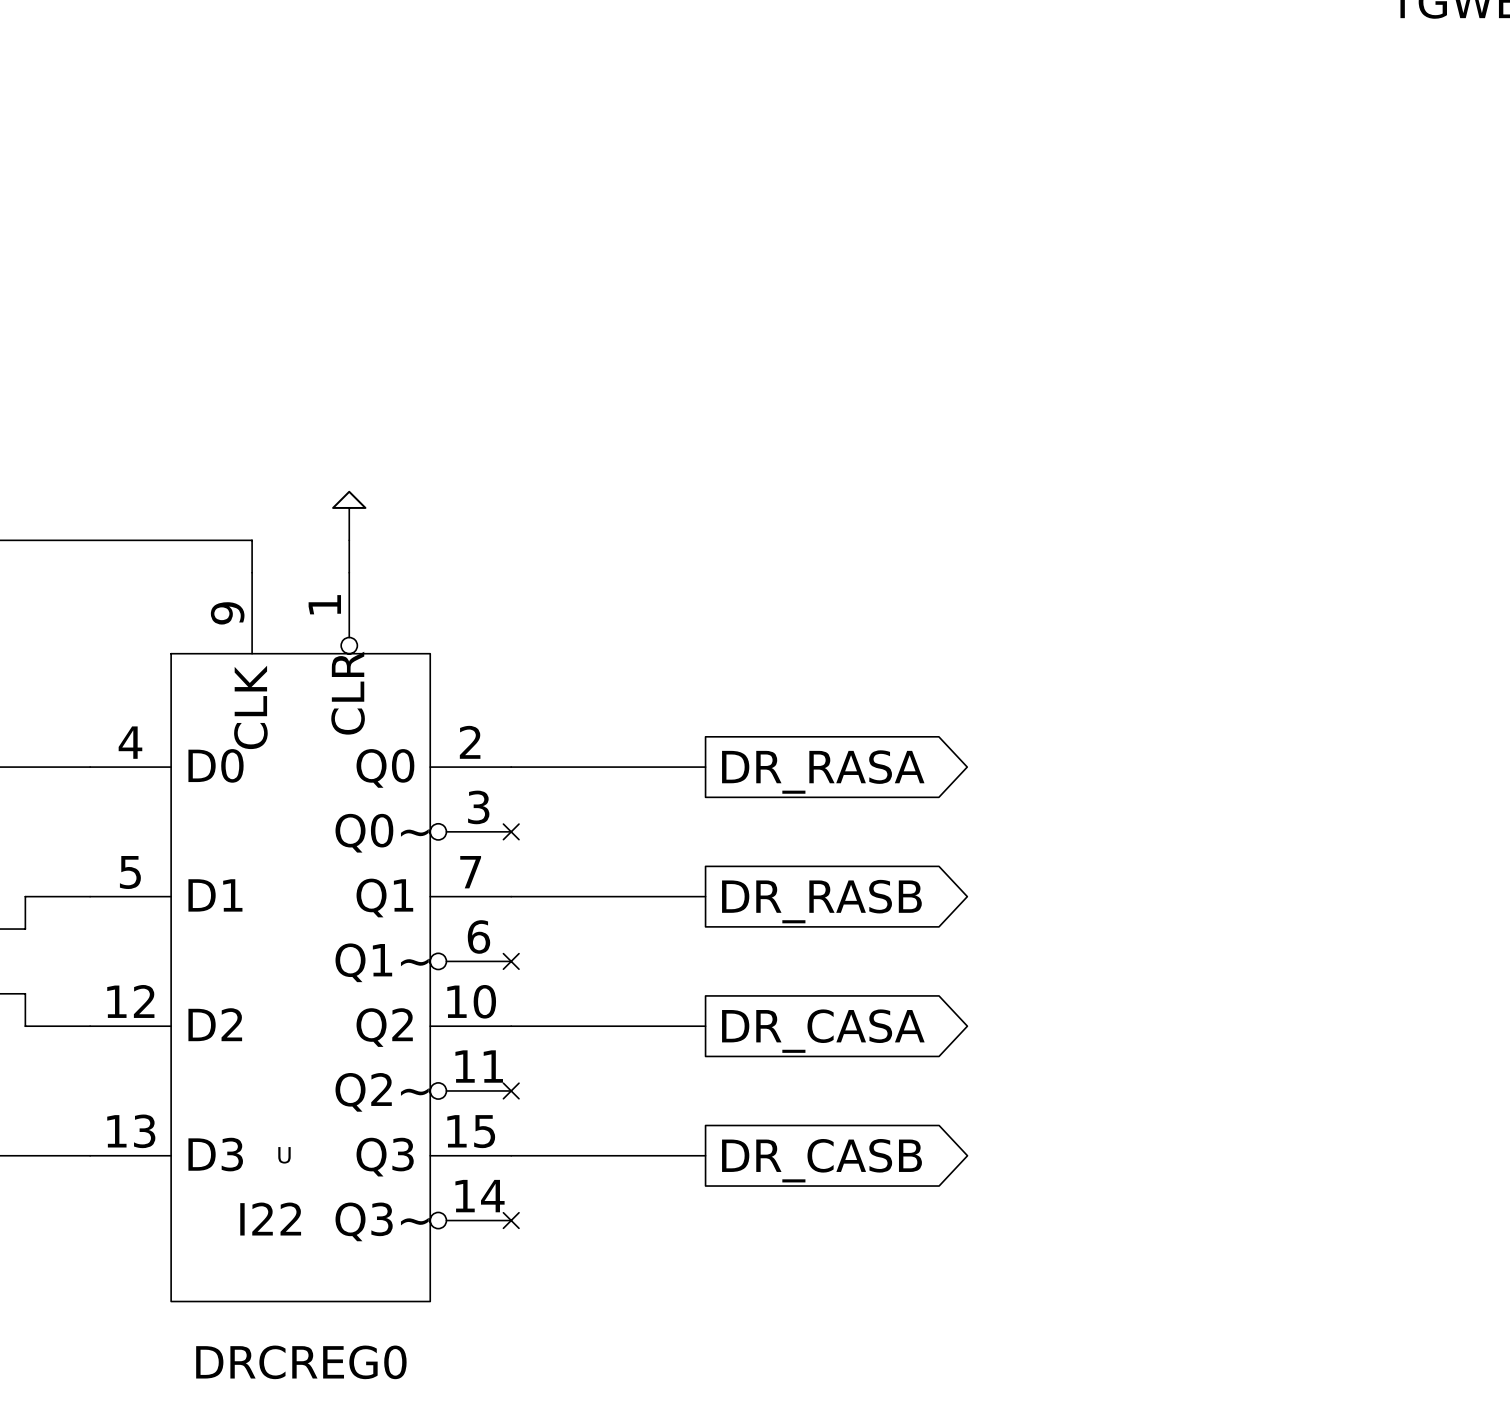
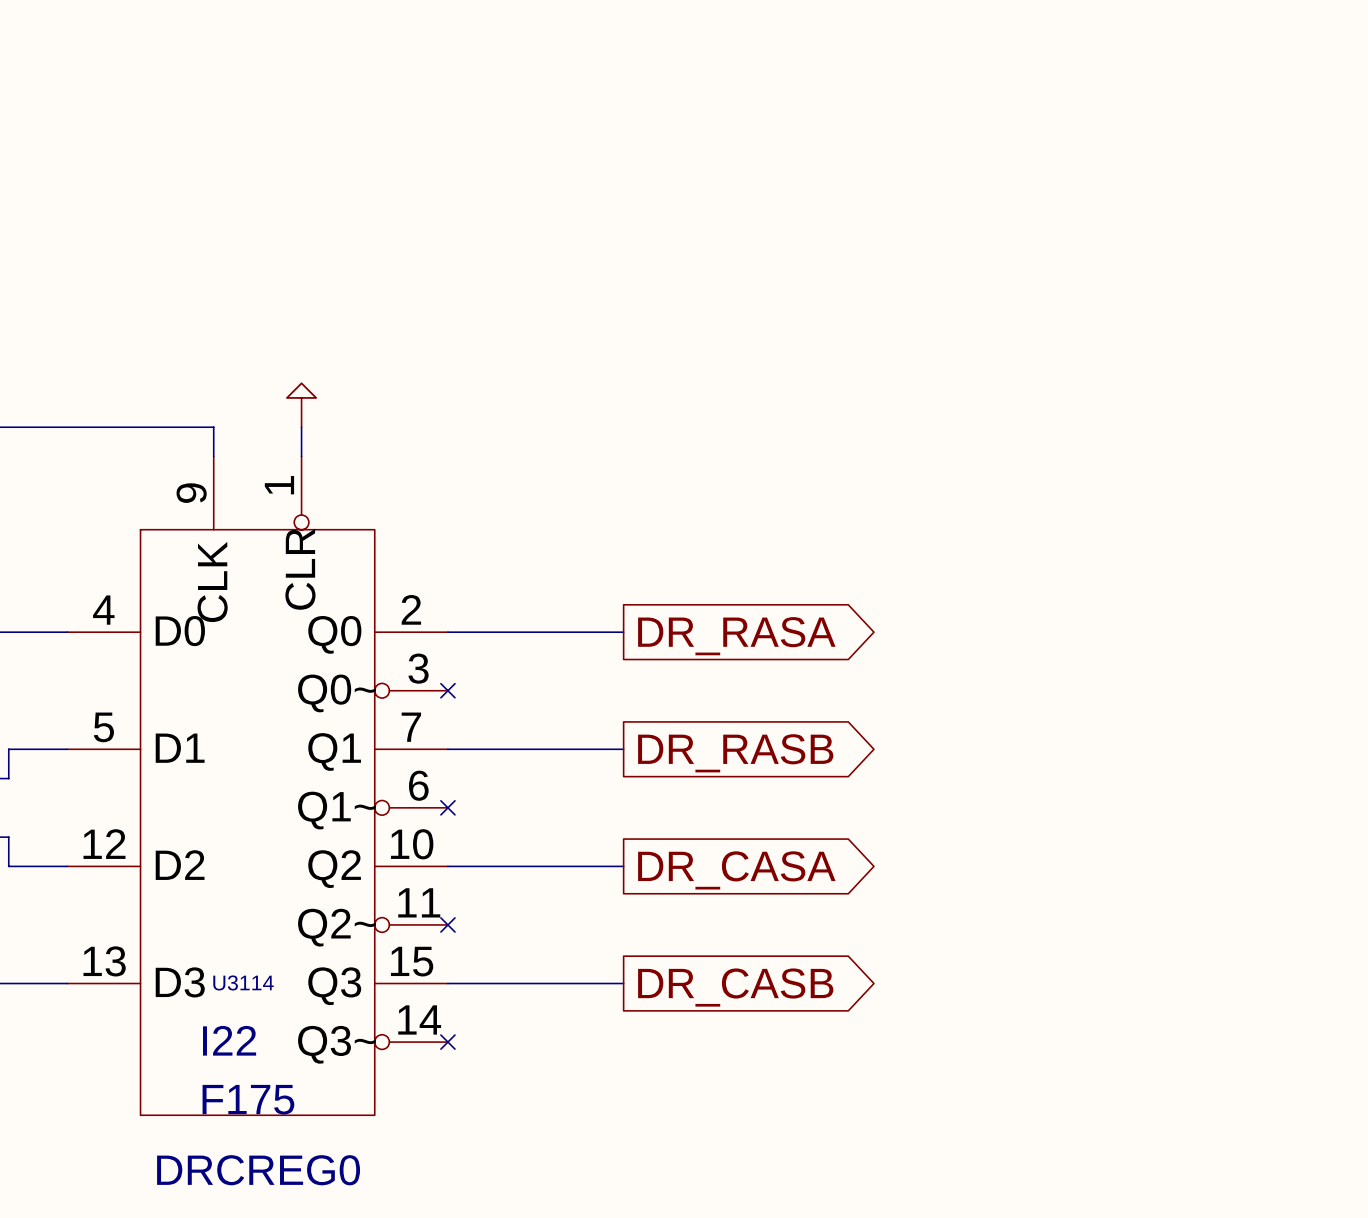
U name: U (284, 1155) -> U3114 (243, 982)
U value: none -> F175 (248, 1099)

